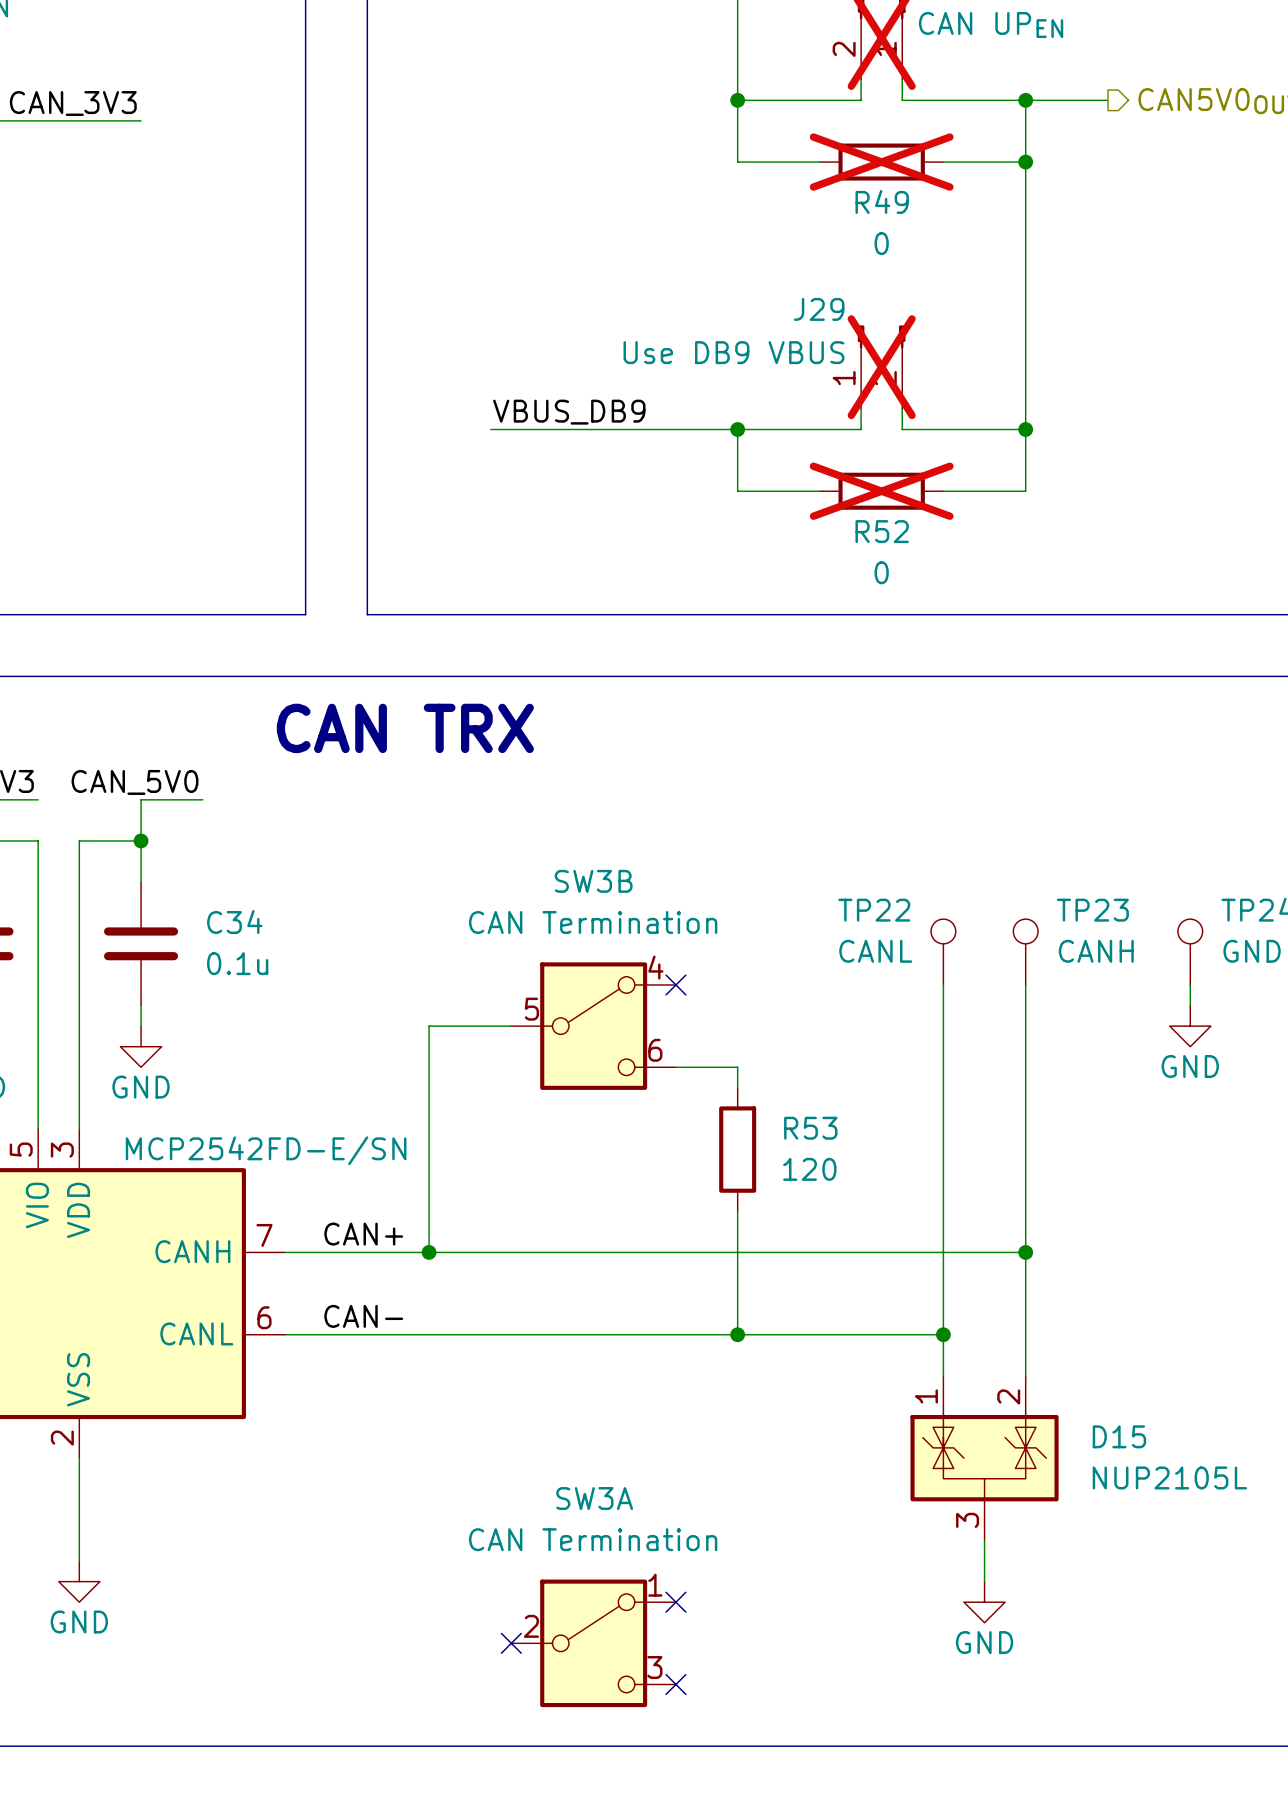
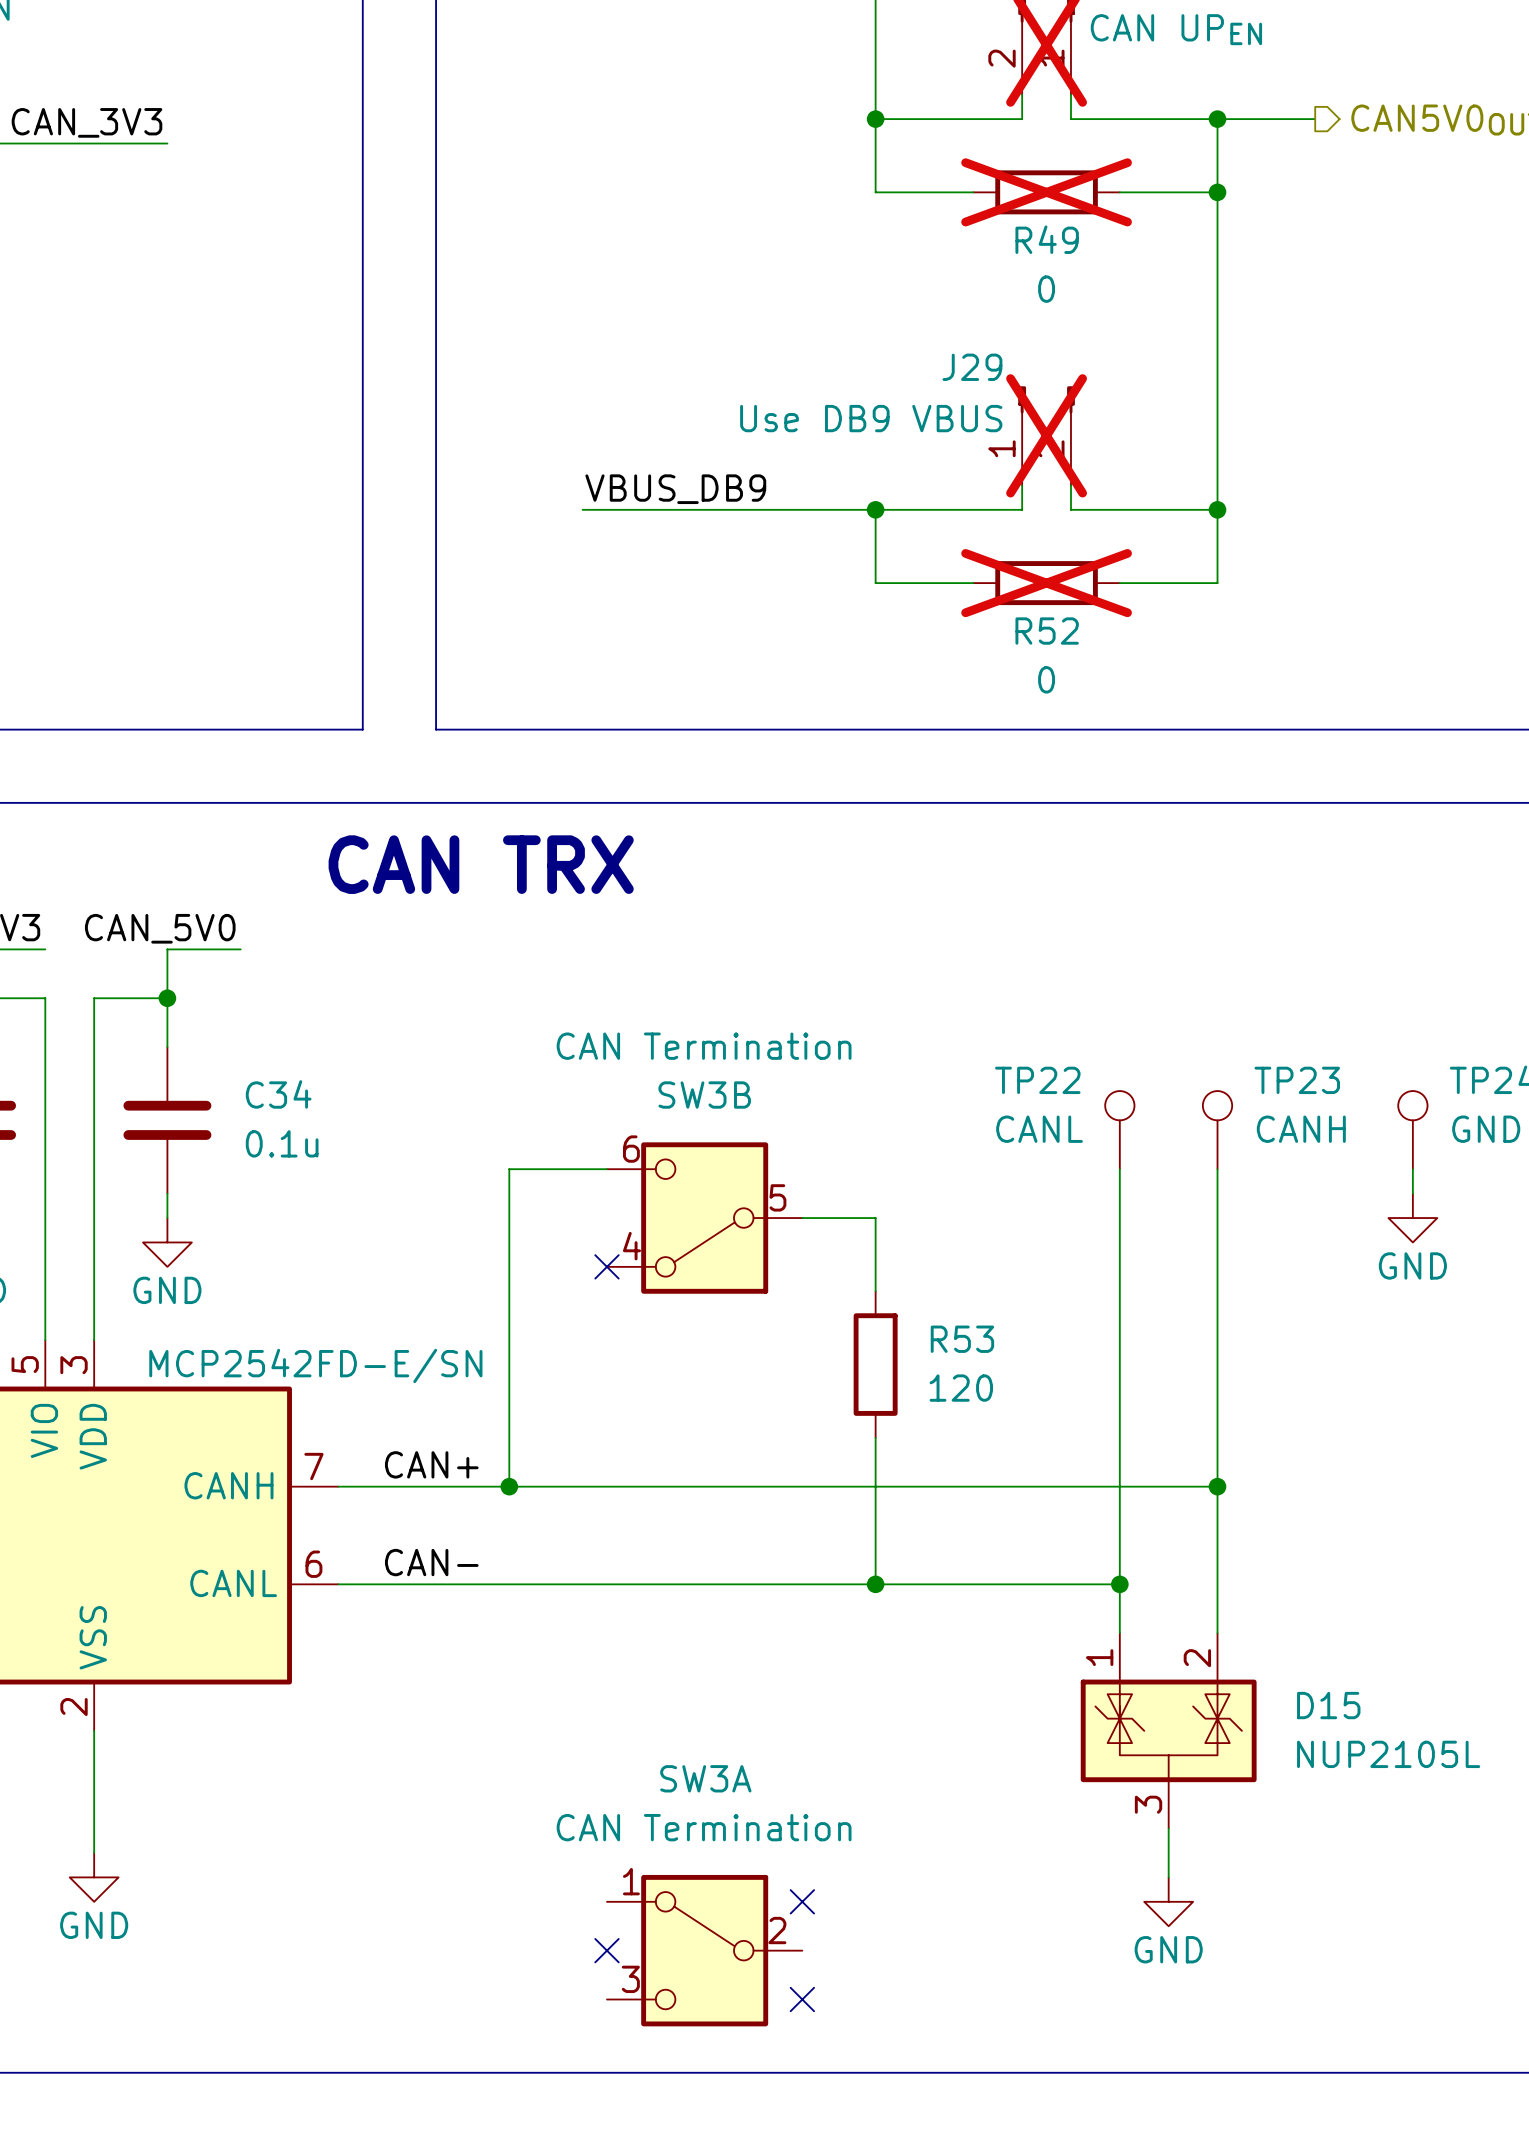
SW3B name position: SW3B (593, 881) -> SW3B (704, 1095)
SW3B value position: CAN Termination (593, 922) -> CAN Termination (704, 1046)
no-connect mark: (675, 984) -> none
wire: (429, 1026) (511, 1026) -> (509, 1218) (509, 1169) (606, 1169)
SW3B rotation: 0° (593, 1026) -> 180° (704, 1218)
no-connect mark: none -> (606, 1266)
wire: (675, 1067) (737, 1067) -> (802, 1218) (875, 1218) (875, 1266)
SW3A flip: as is (593, 1643) -> left-right (704, 1950)

